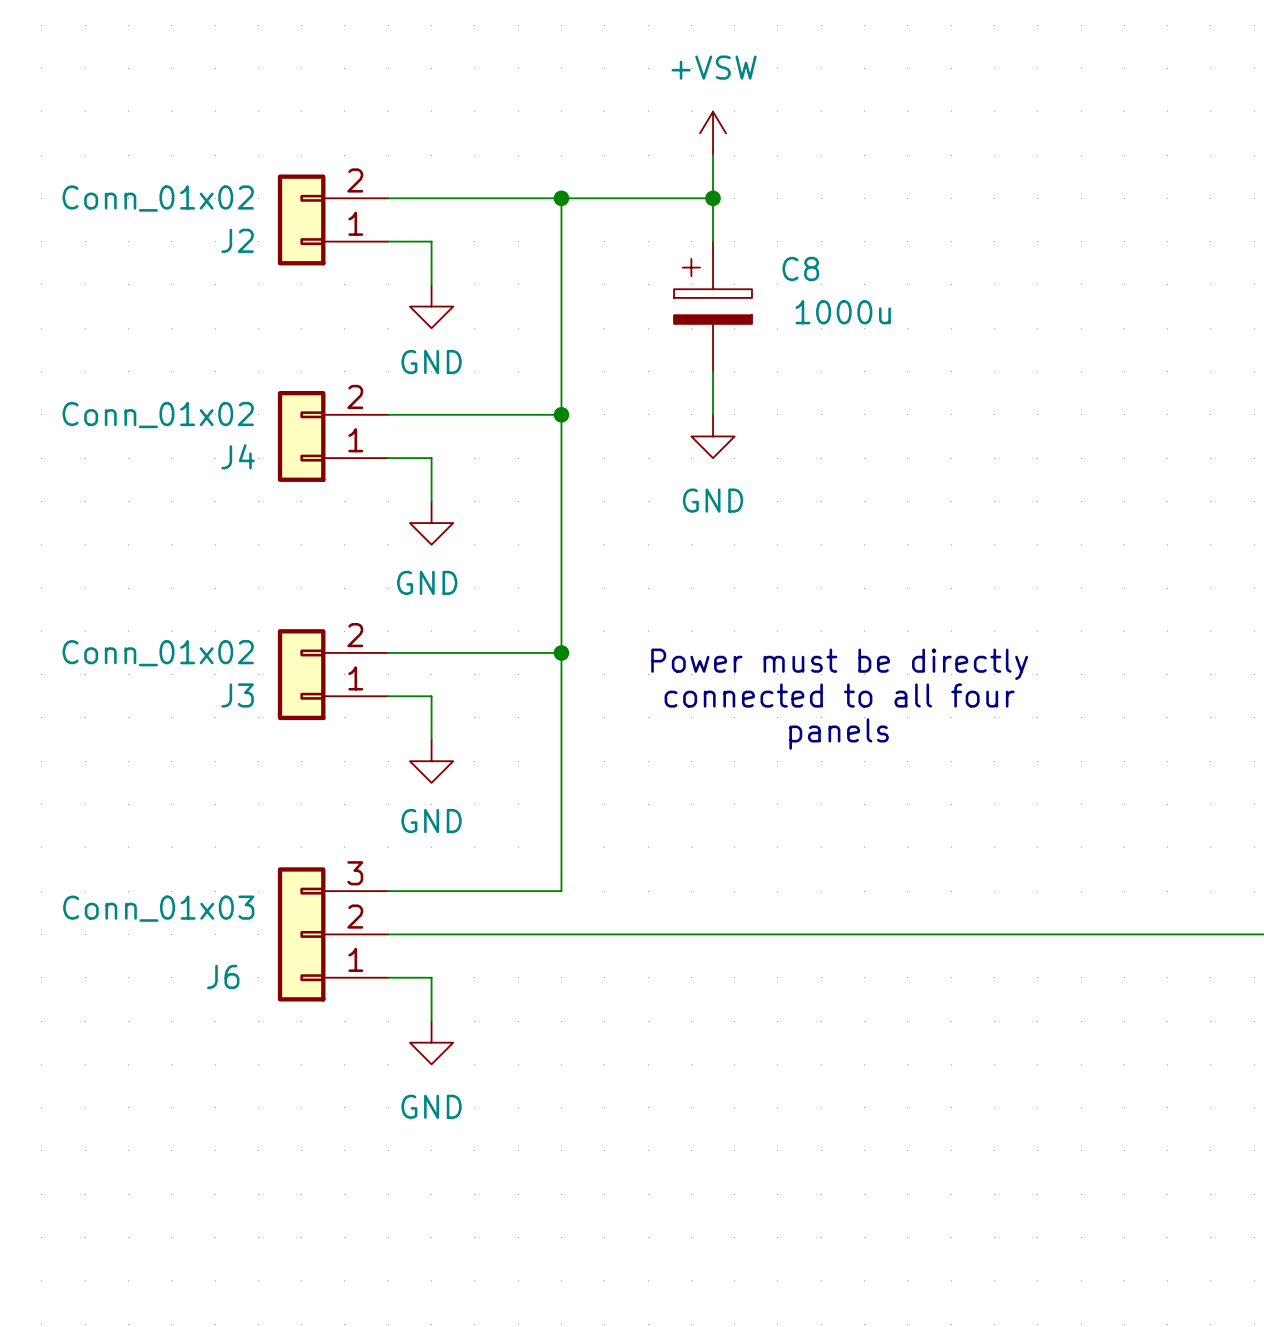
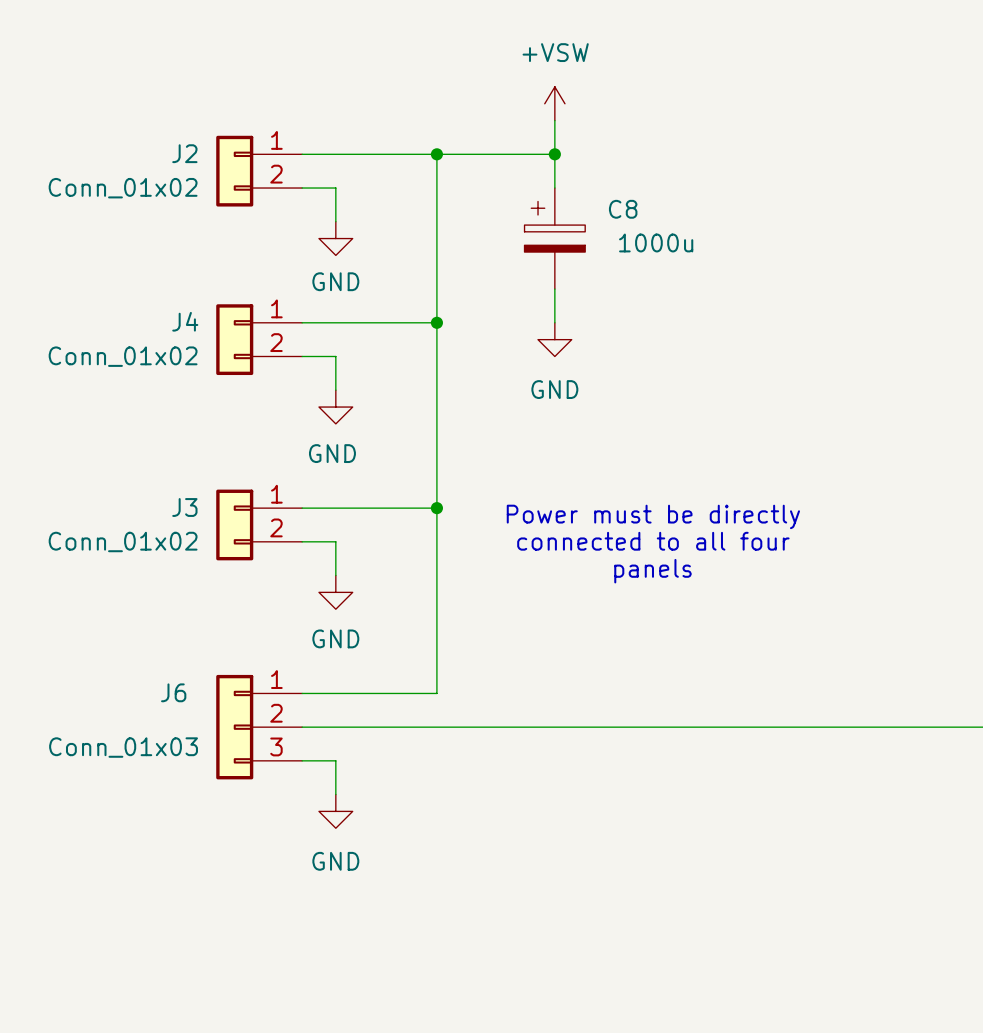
J2 flip: as is (301, 219) -> up-down (234, 171)
J4 flip: as is (301, 436) -> up-down (234, 339)
J3 flip: as is (301, 674) -> up-down (234, 524)
J6 flip: as is (301, 934) -> up-down (234, 727)

